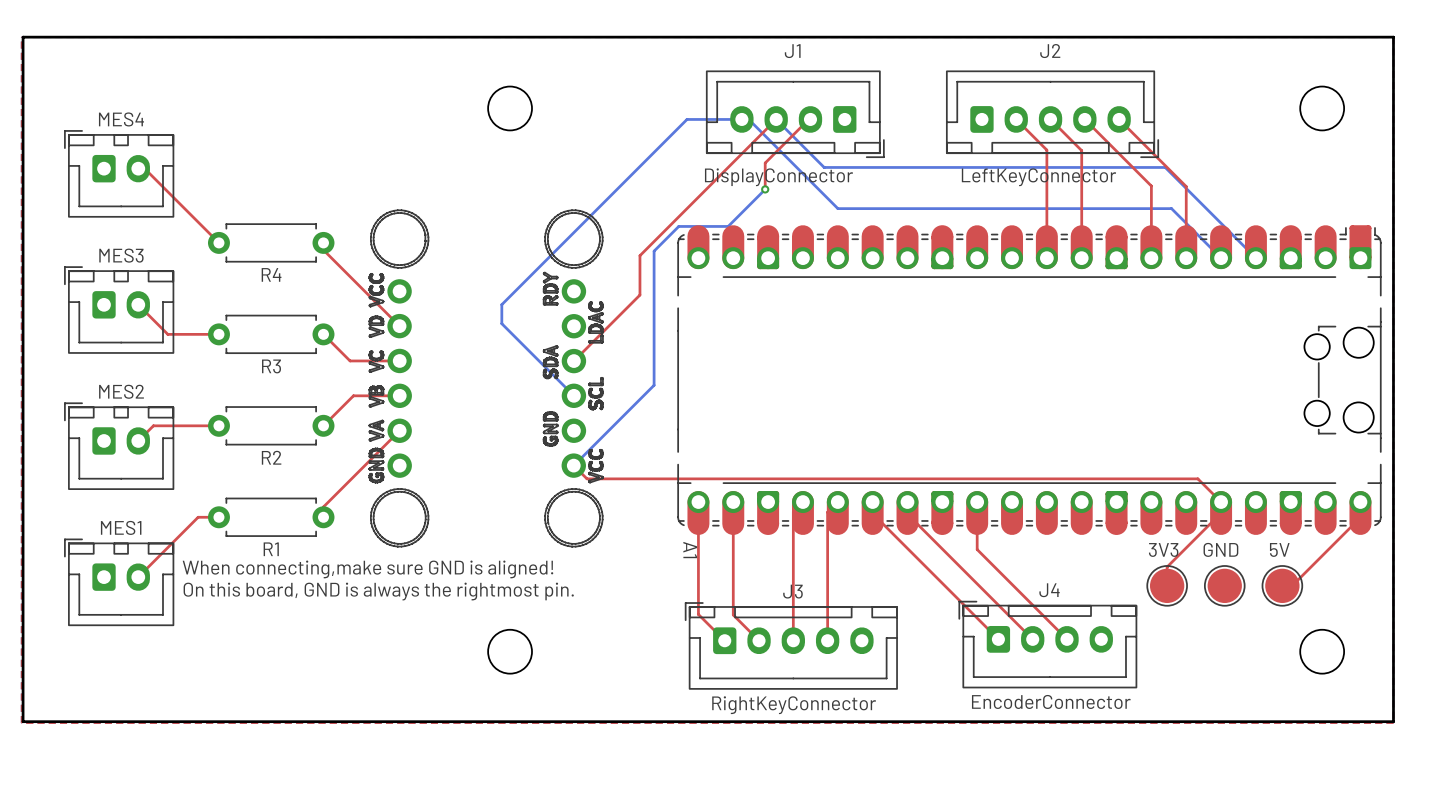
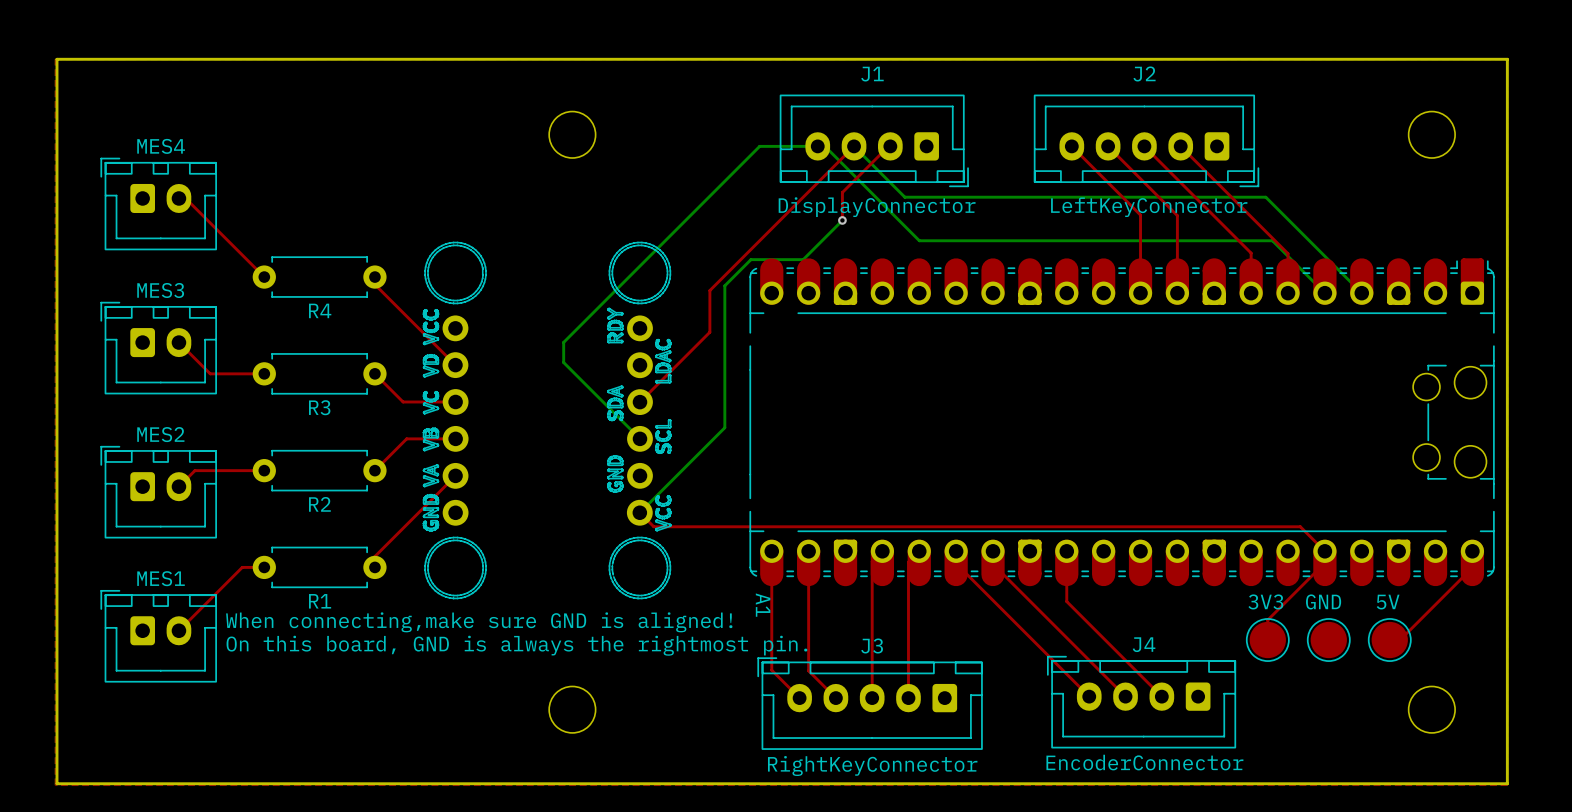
J2 footprint: [946, 70, 1160, 159] -> [1033, 94, 1260, 188]
top track: none -> (1071, 146) (1140, 215)
top track: (1119, 119) (1186, 186) (1186, 220) -> none
top track: (1046, 150) (1046, 184) -> (1140, 178) (1177, 215)
top track: (1081, 150) (1081, 184) -> (1177, 179) (1251, 253)
top track: (1151, 186) (1151, 220) -> (1251, 216) (1288, 253)
J4 footprint: [958, 600, 1138, 689] -> [1046, 655, 1237, 749]
J3 footprint: [684, 602, 898, 690] -> [757, 657, 983, 750]

